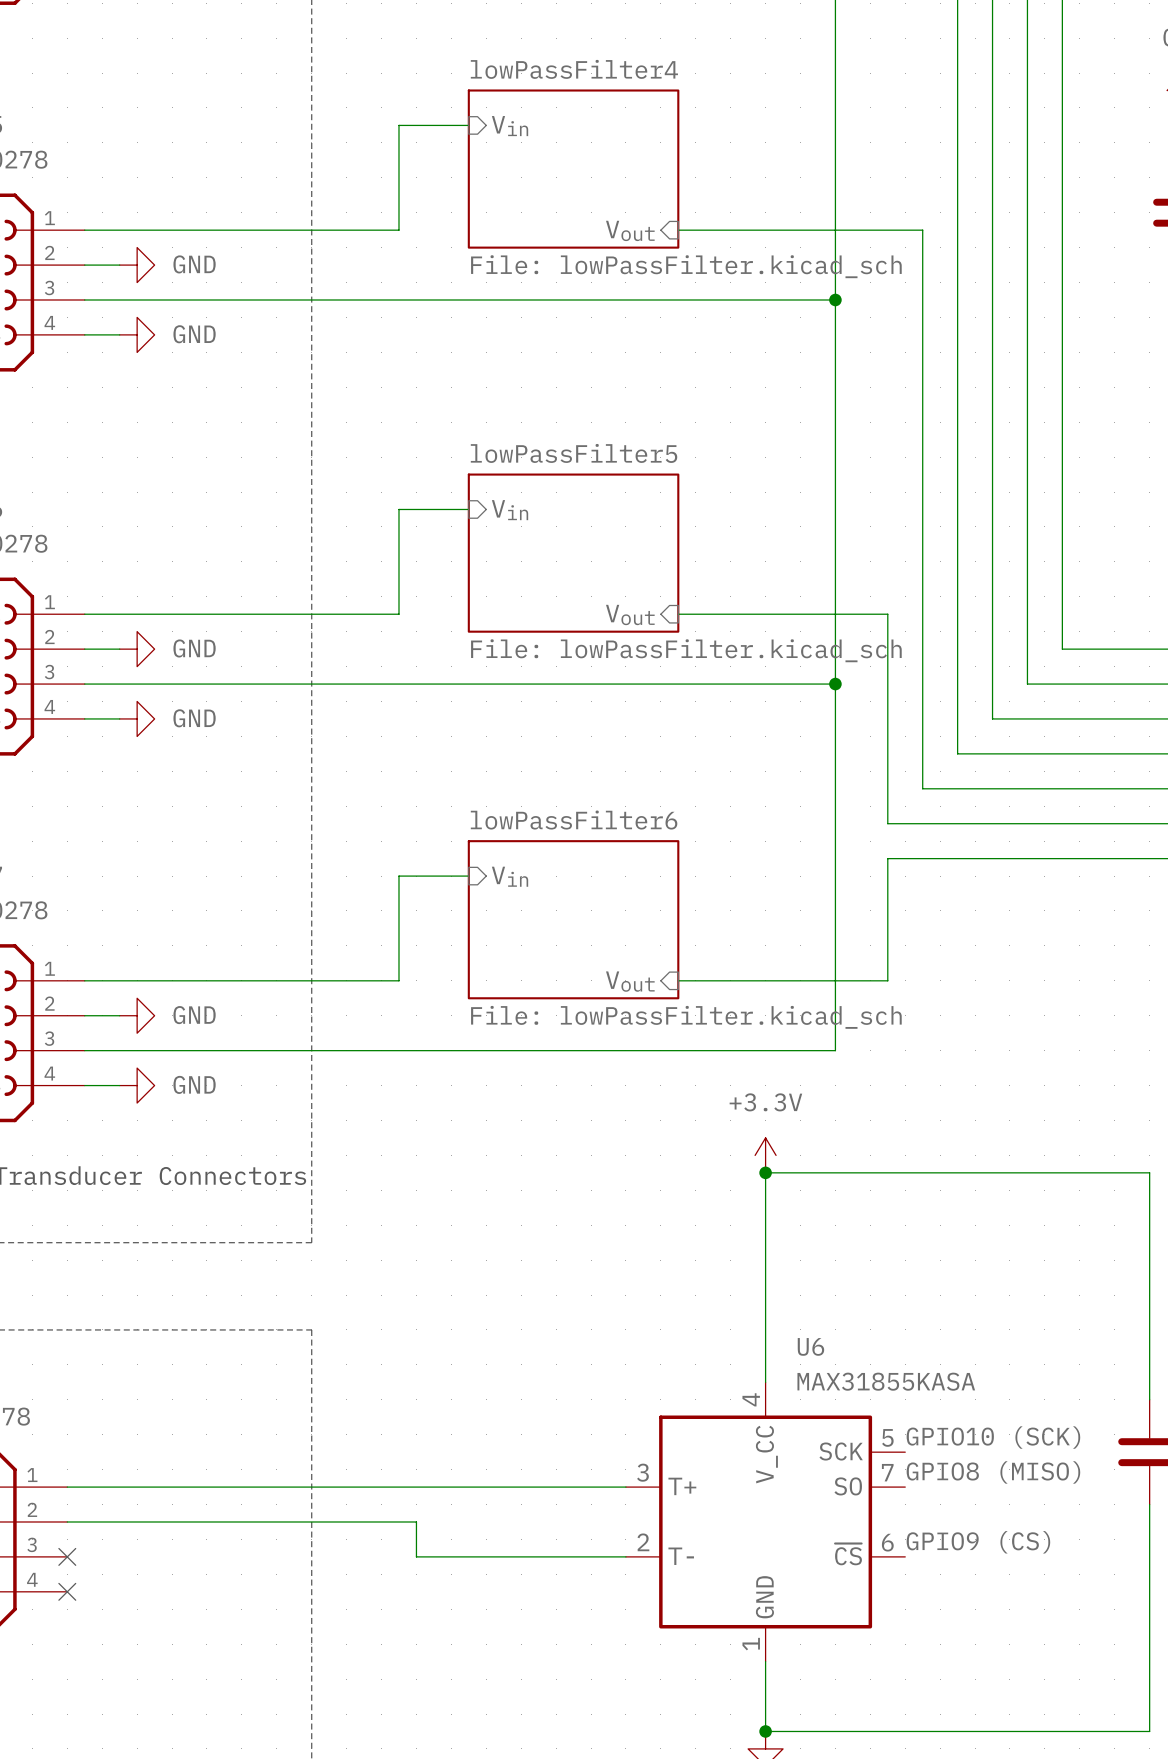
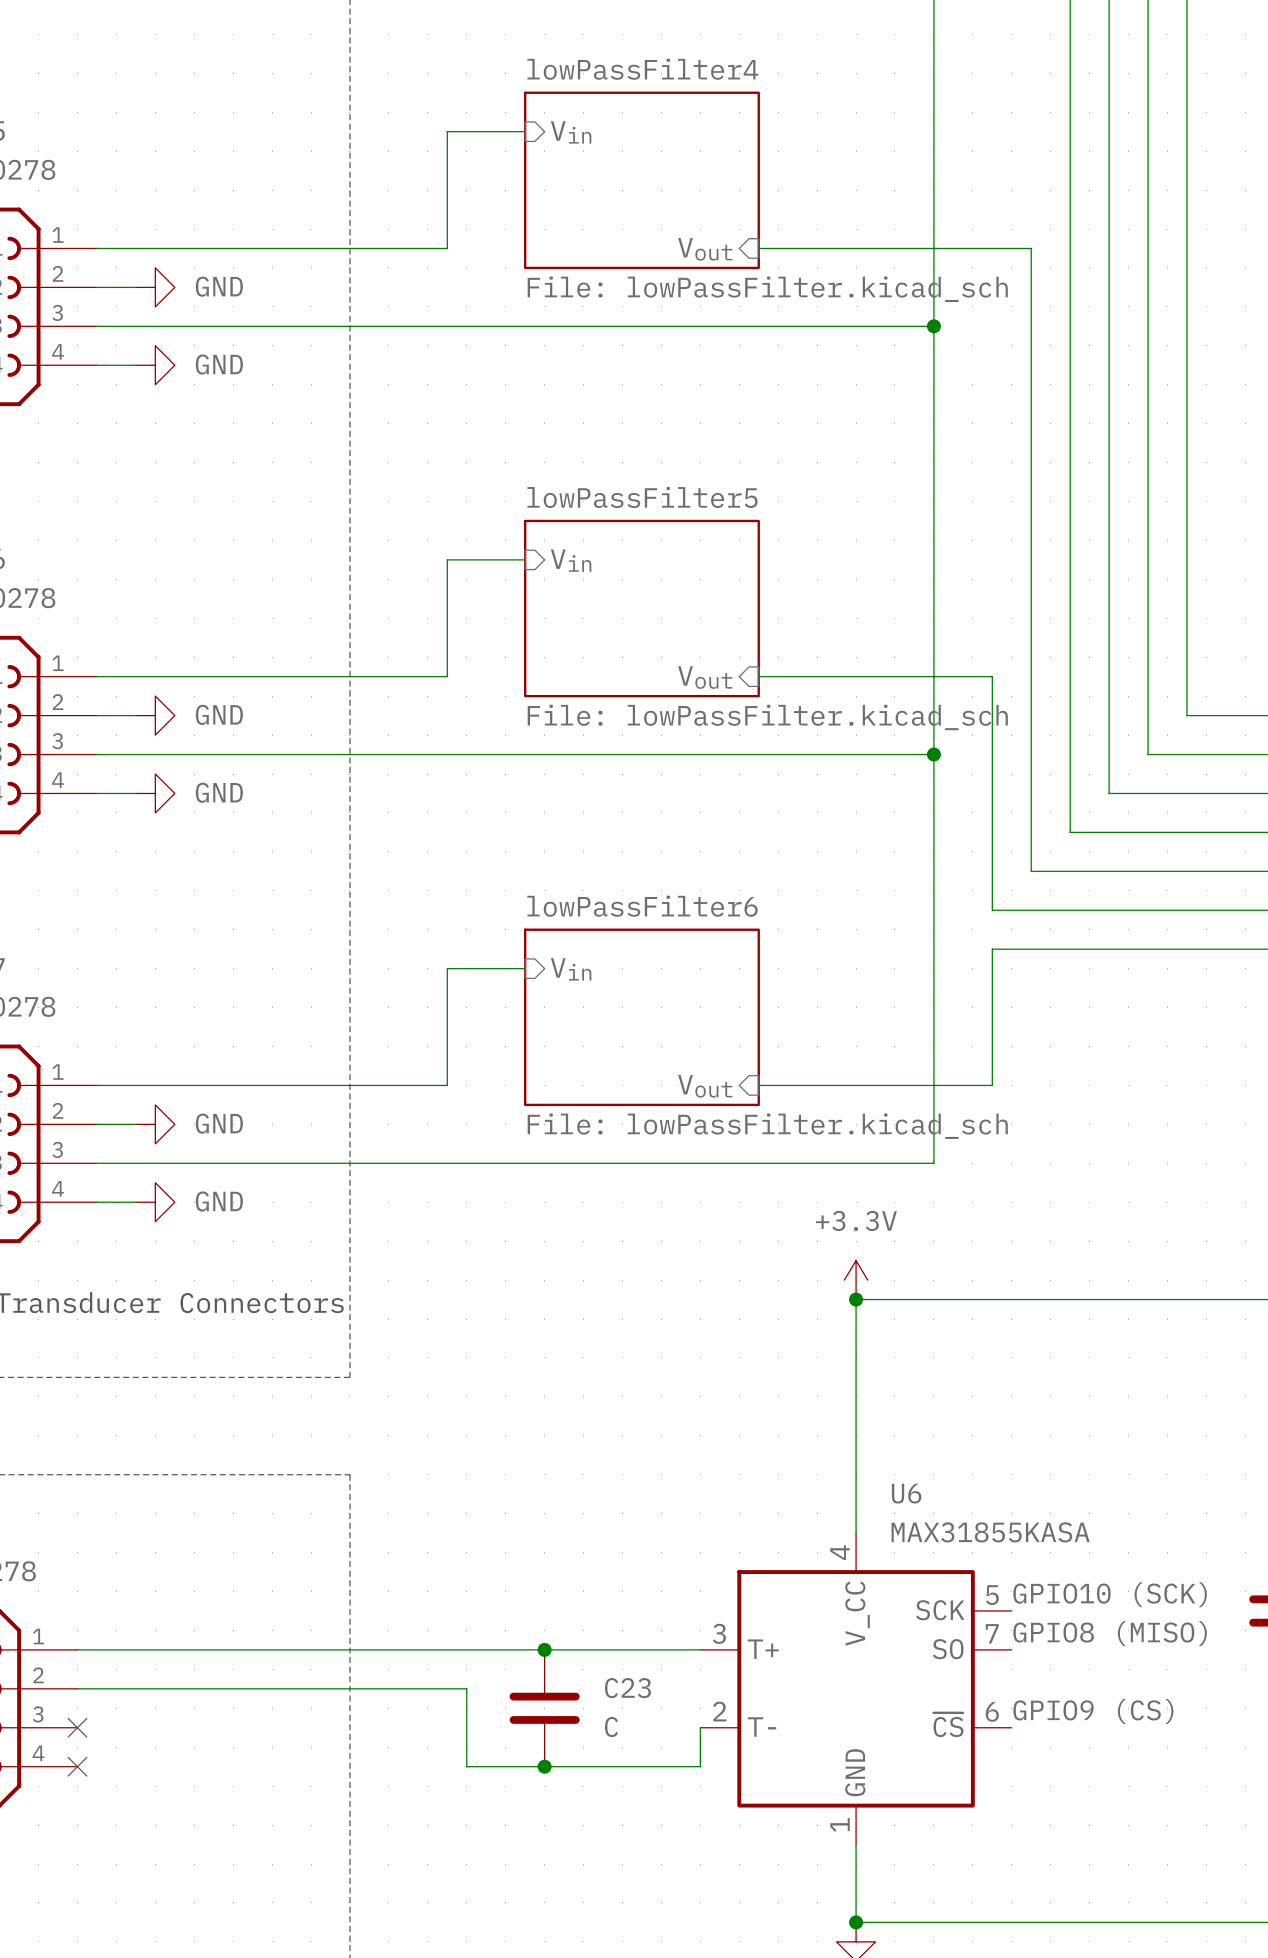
junction: none -> (544, 1649)
C23: none -> C (544, 1708)
wire: (416, 1556) (625, 1556) -> (466, 1727) (466, 1766) (700, 1766) (700, 1727)
junction: none -> (544, 1766)

